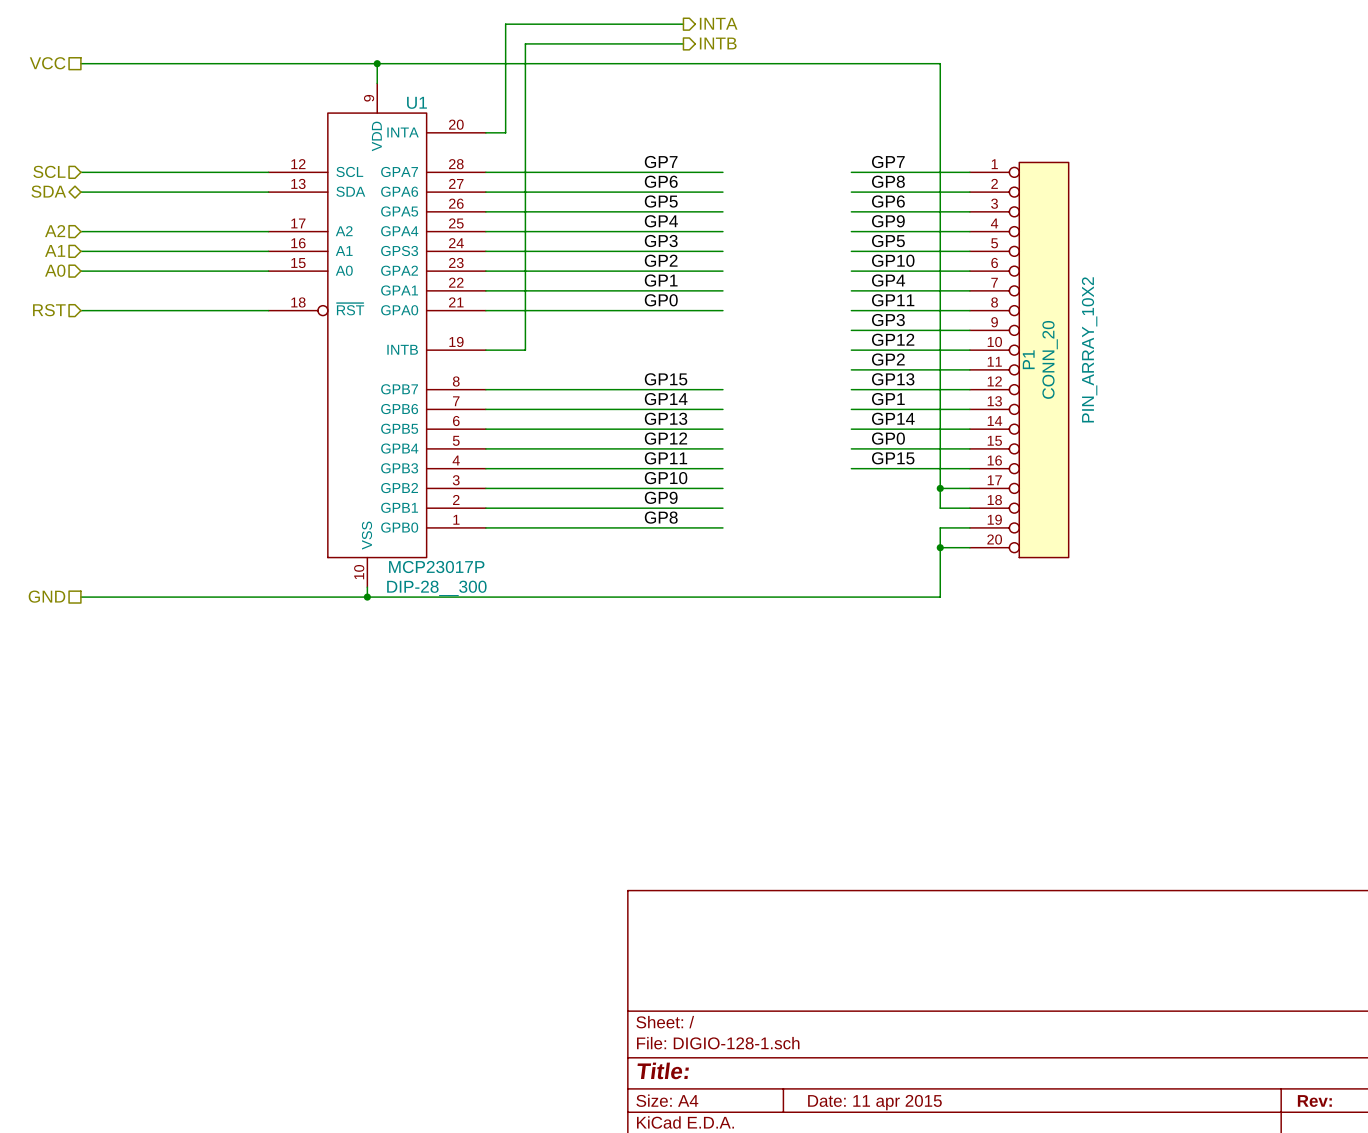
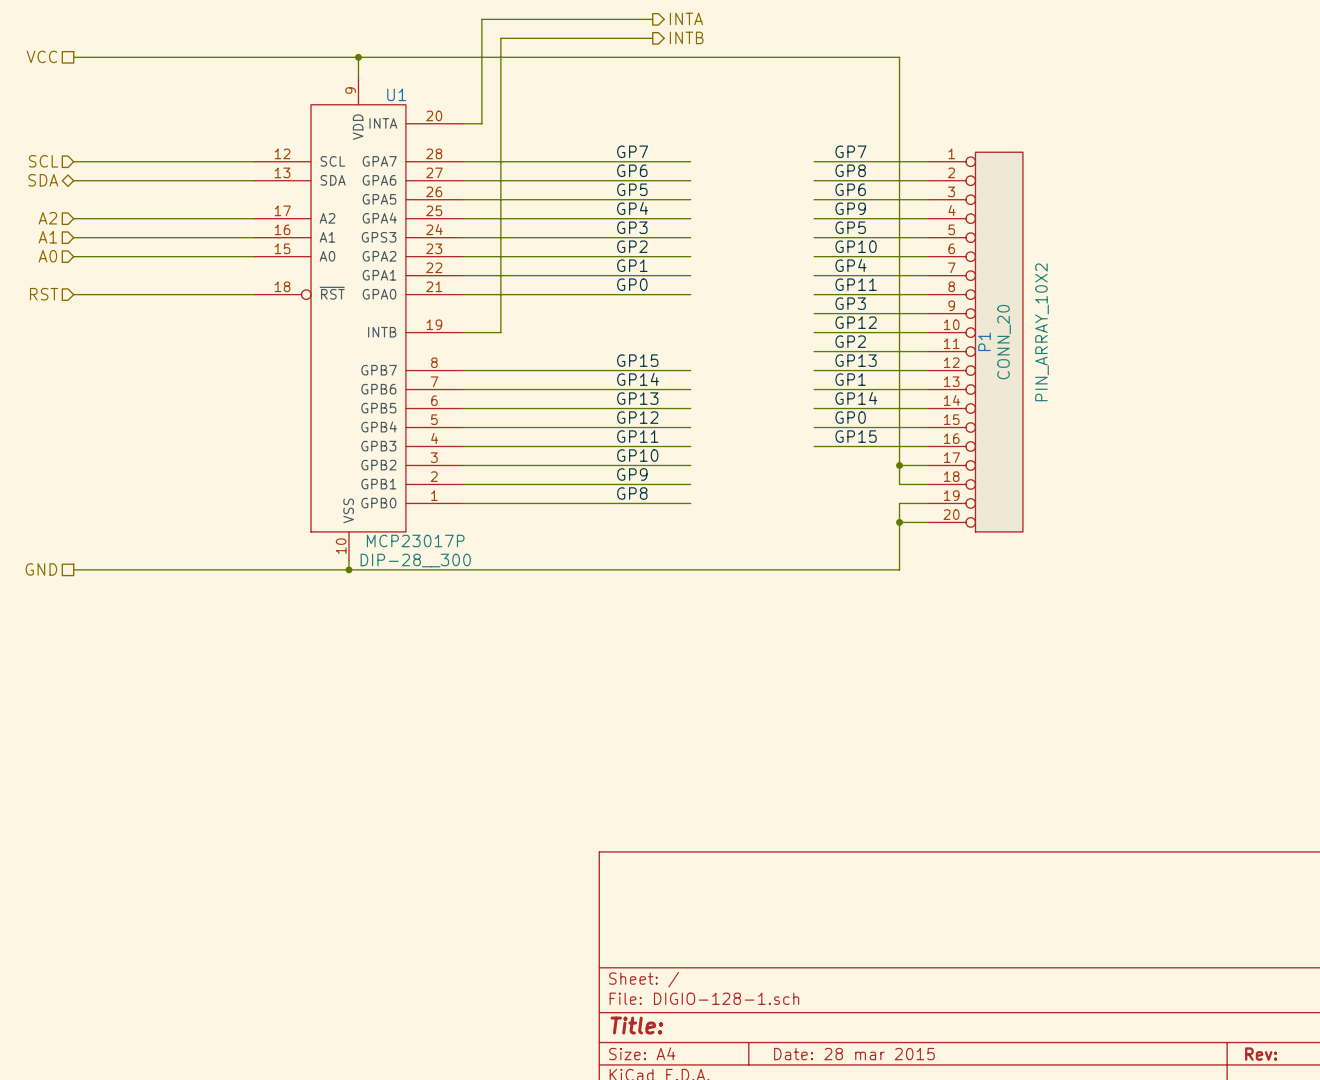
title block: Date: 11 apr 2015 (874, 1102) -> Date: 28 mar 2015 (854, 1054)

